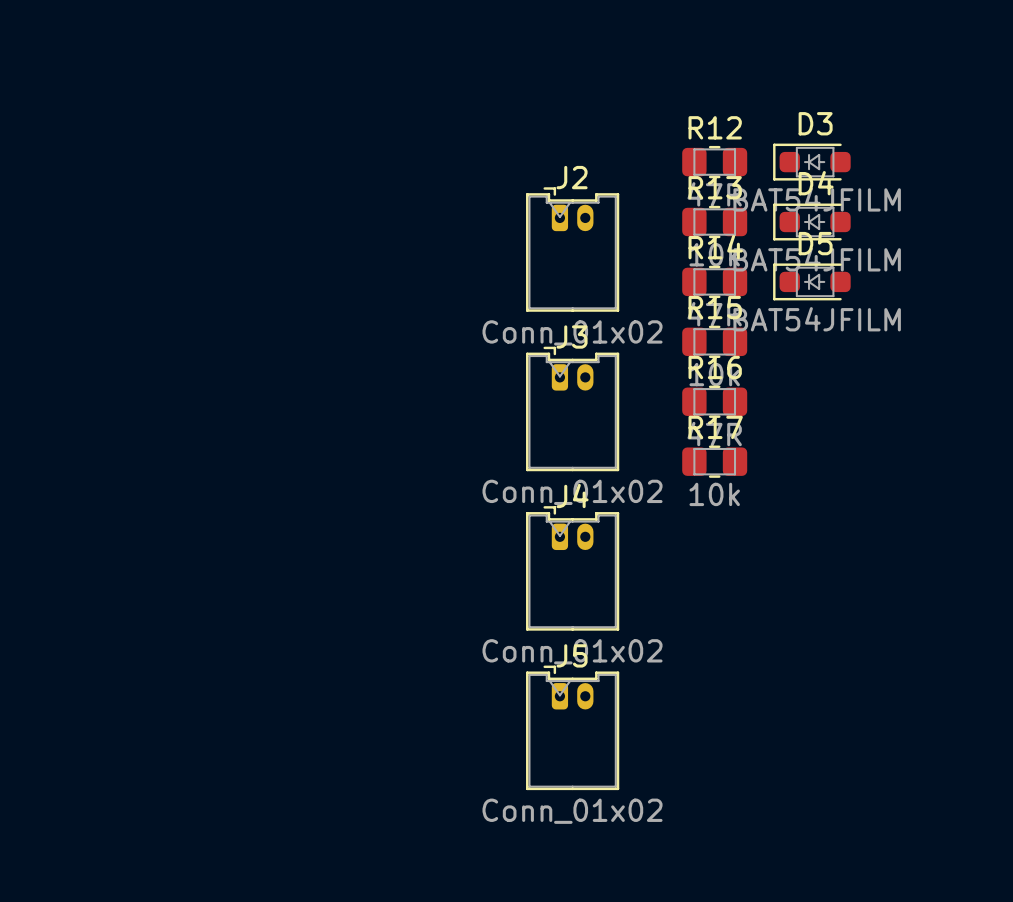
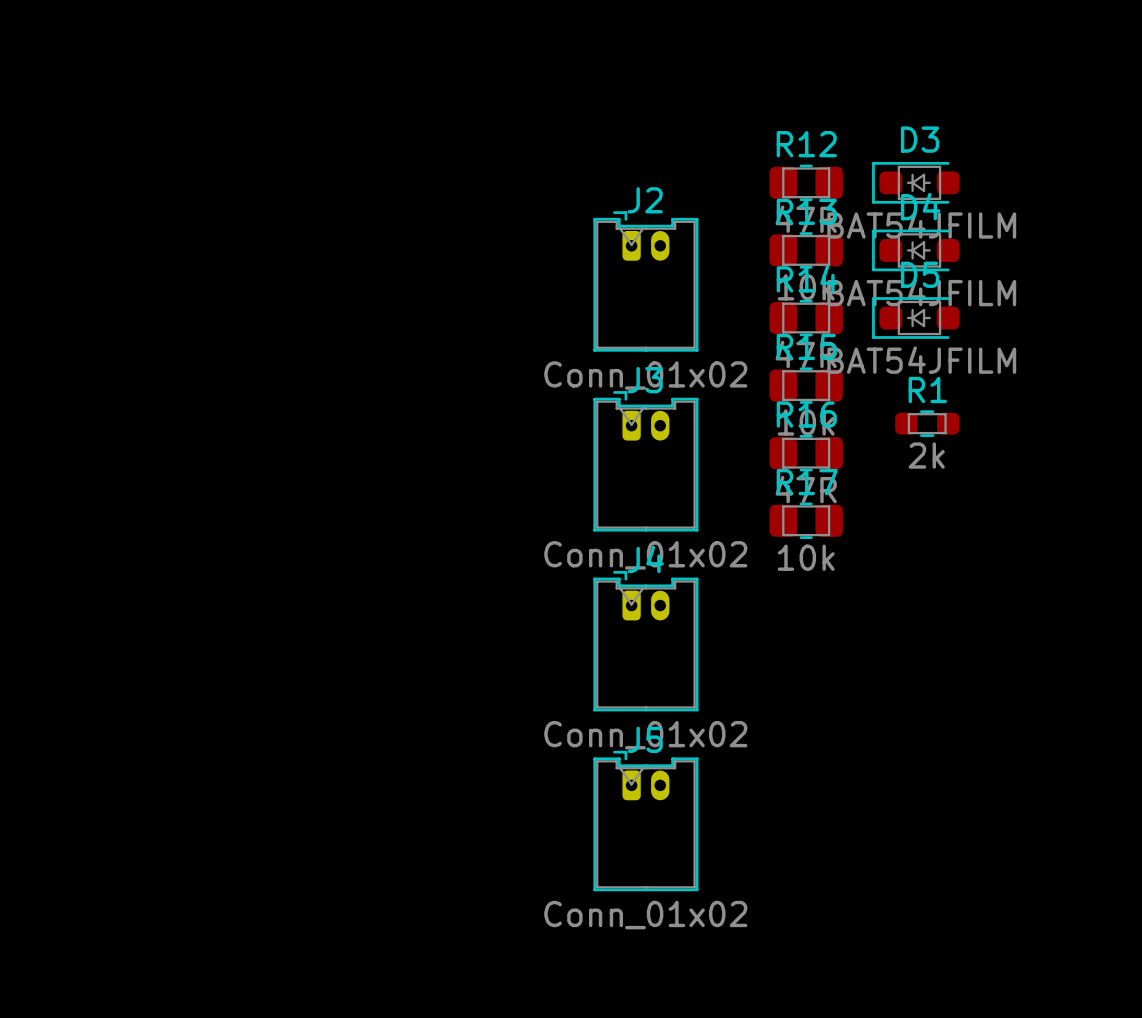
R1: none -> 2k (927, 423)

